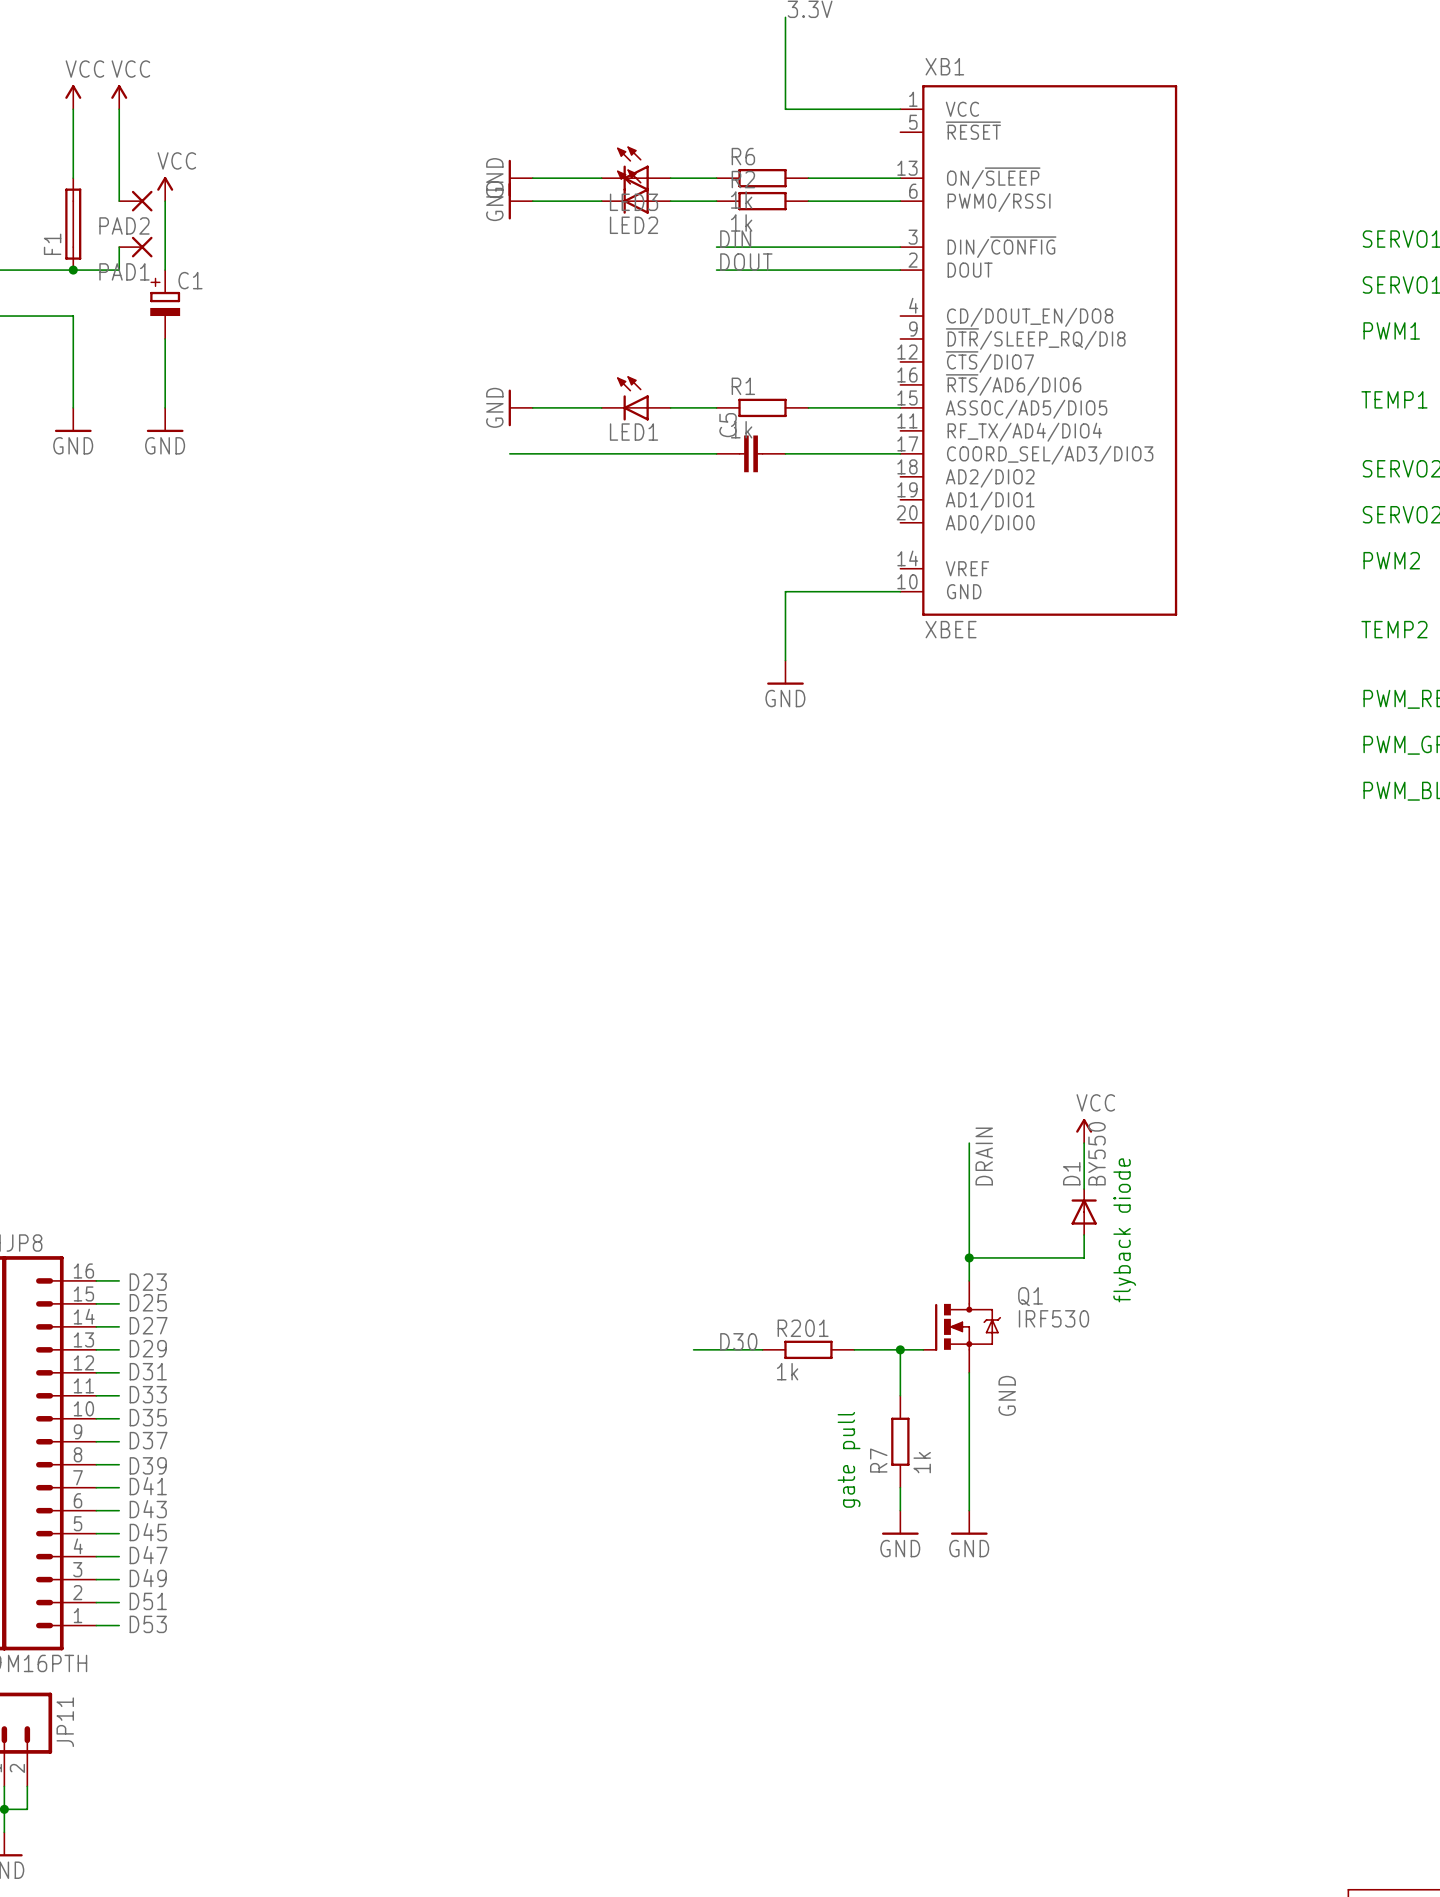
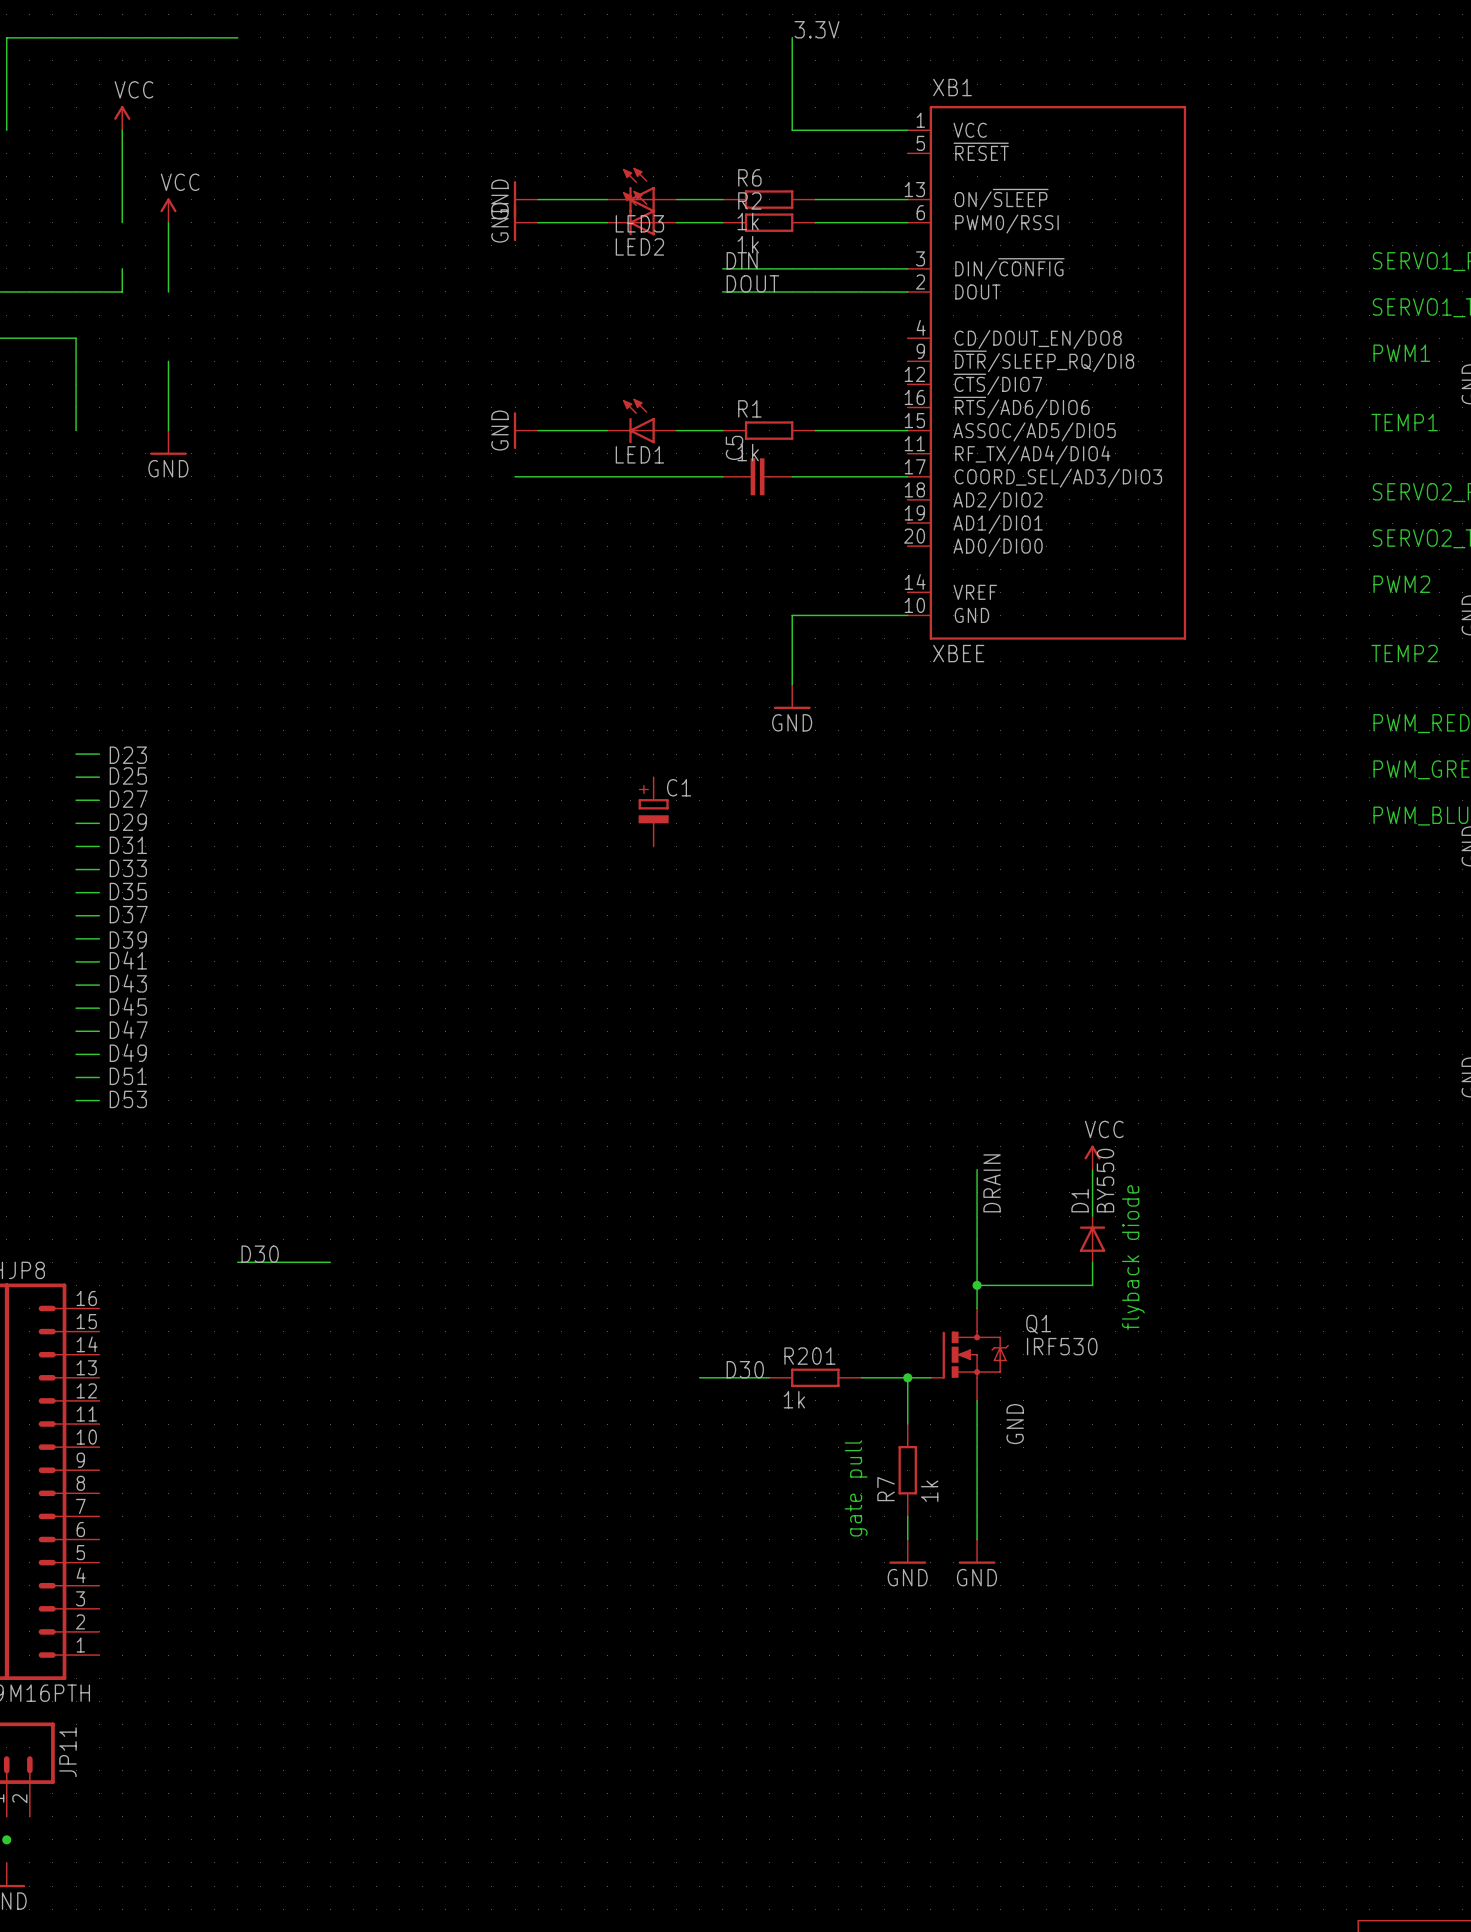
wire: none -> (237, 37) (6, 37) (6, 130)
power symbol: VCC (73, 97) -> none
wire: (73, 109) (73, 178) -> none
PAD2: (135, 201) -> none
F1: (73, 224) -> none
PAD1: (135, 247) -> none
junction: (73, 270) -> none
C1 position: (165, 304) -> (653, 811)
power symbol: GND (73, 419) -> none
wire: none -> (76, 754) (99, 754)
label: none -> D23 (128, 755)
label: none -> D25 (128, 775)
wire: none -> (76, 777) (99, 777)
label: none -> D27 (128, 799)
wire: none -> (76, 800) (99, 800)
label: none -> D29 (128, 822)
wire: none -> (76, 823) (99, 823)
label: none -> D31 (128, 845)
wire: none -> (76, 846) (99, 846)
label: none -> D33 (128, 868)
wire: none -> (76, 869) (99, 869)
label: none -> D35 (128, 891)
wire: none -> (76, 892) (99, 892)
label: none -> D37 (128, 914)
wire: none -> (76, 915) (99, 915)
wire: none -> (76, 938) (99, 938)
label: none -> D39 (128, 940)
label: none -> D41 (128, 960)
wire: none -> (76, 961) (99, 961)
label: none -> D43 (128, 983)
wire: none -> (76, 985) (99, 985)
label: none -> D45 (128, 1006)
wire: none -> (76, 1008) (99, 1008)
label: none -> D47 (128, 1029)
wire: none -> (76, 1031) (99, 1031)
label: none -> D49 (128, 1052)
wire: none -> (76, 1054) (99, 1054)
label: none -> D51 (128, 1076)
wire: none -> (76, 1077) (99, 1077)
label: none -> D53 (128, 1099)
label: none -> D30 (260, 1254)
wire: none -> (237, 1262) (330, 1262)
wire: (96, 1280) (119, 1280) -> (76, 1100) (99, 1100)
label: D23 (148, 1282) -> none
label: D25 (148, 1302) -> none
wire: (96, 1303) (119, 1303) -> none
label: D27 (148, 1325) -> none
wire: (96, 1326) (119, 1326) -> none
label: D29 (148, 1348) -> none
wire: (96, 1349) (119, 1349) -> none
label: D31 (148, 1371) -> none
wire: (96, 1372) (119, 1372) -> none
label: D33 (148, 1394) -> none
wire: (96, 1395) (119, 1395) -> none
label: D35 (148, 1417) -> none
wire: (96, 1418) (119, 1418) -> none
label: D37 (148, 1440) -> none
wire: (96, 1441) (119, 1441) -> none
wire: (96, 1464) (119, 1464) -> none
label: D39 (148, 1465) -> none
label: D41 (148, 1486) -> none
wire: (96, 1487) (119, 1487) -> none
label: D43 (148, 1509) -> none
wire: (96, 1510) (119, 1510) -> none
label: D45 (148, 1532) -> none
wire: (96, 1533) (119, 1533) -> none
label: D47 (148, 1555) -> none
wire: (96, 1556) (119, 1556) -> none
label: D49 (148, 1578) -> none
wire: (96, 1579) (119, 1579) -> none
label: D51 (148, 1601) -> none
wire: (96, 1602) (119, 1602) -> none
label: D53 (148, 1624) -> none
wire: (96, 1625) (119, 1625) -> none
wire: (4, 1786) (4, 1832) -> none
wire: (27, 1786) (27, 1809) (4, 1809) -> none

